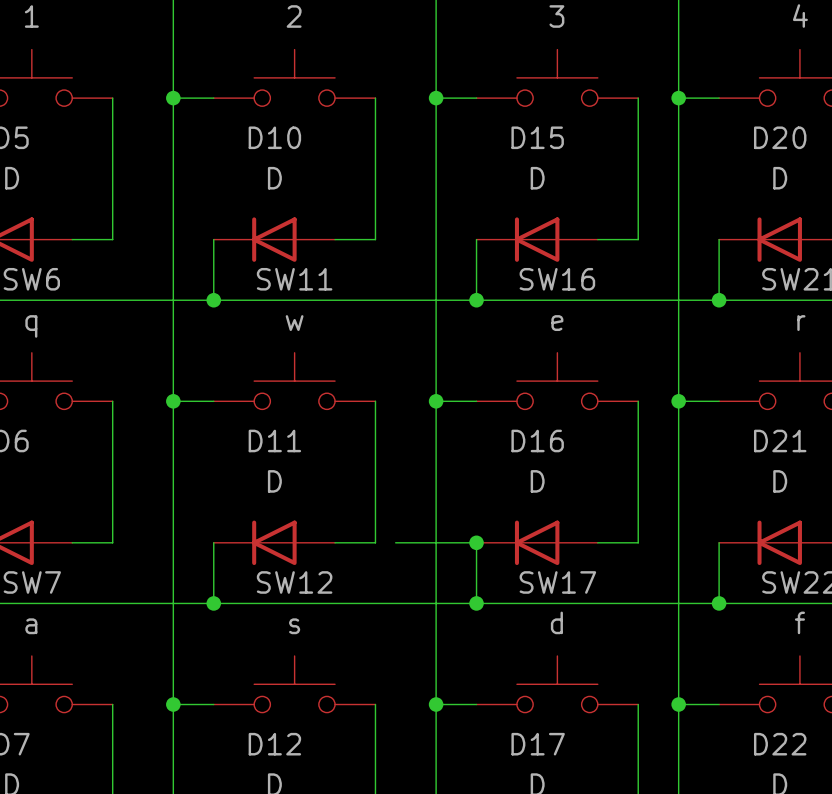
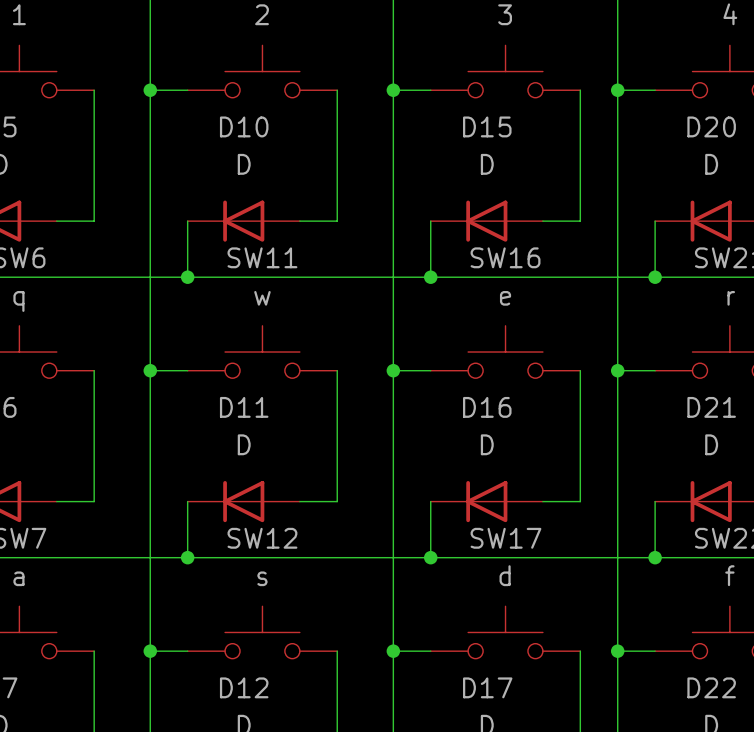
wire: (395, 542) (476, 542) -> none
junction: (476, 542) -> none

